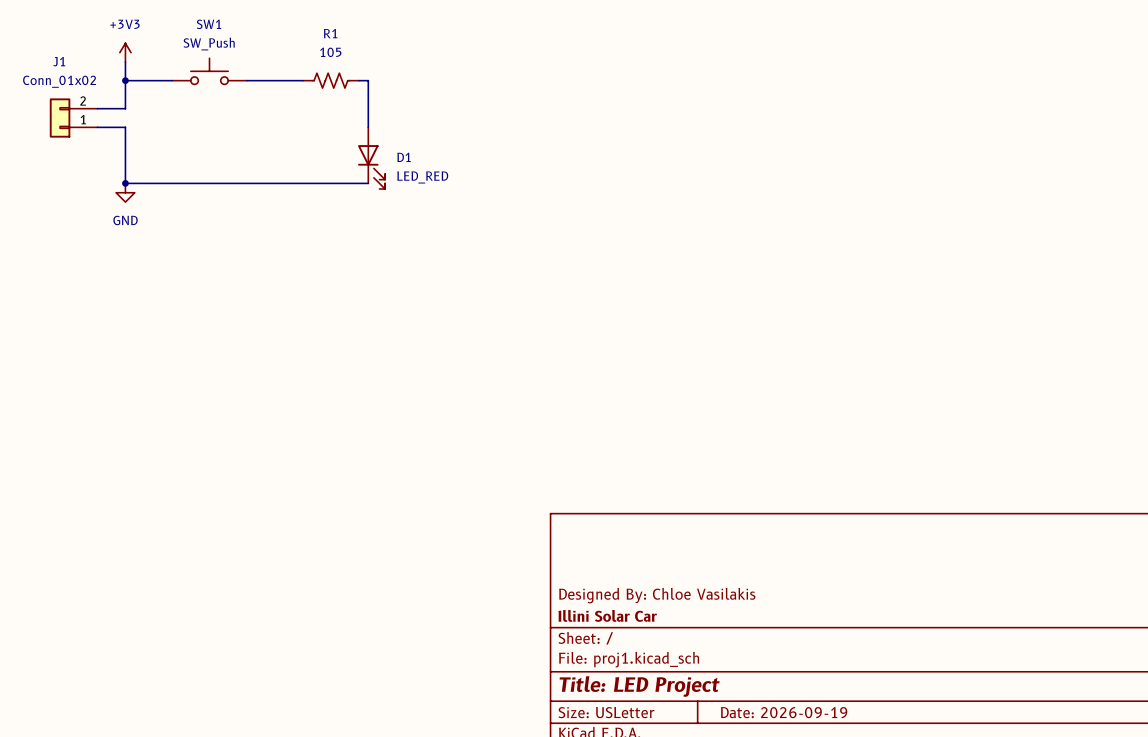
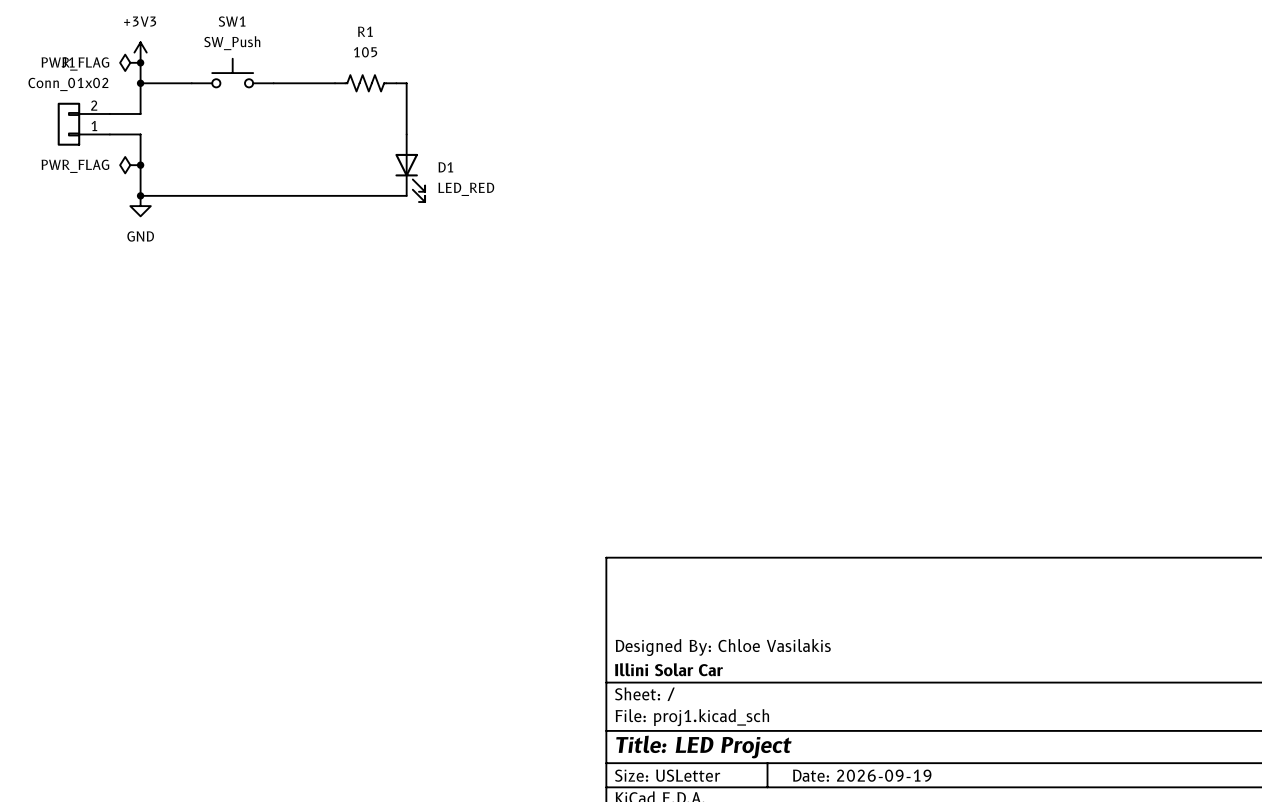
power symbol: none -> PWR_FLAG (130, 62)
junction: none -> (140, 62)
power symbol: none -> PWR_FLAG (130, 165)
junction: none -> (140, 165)

